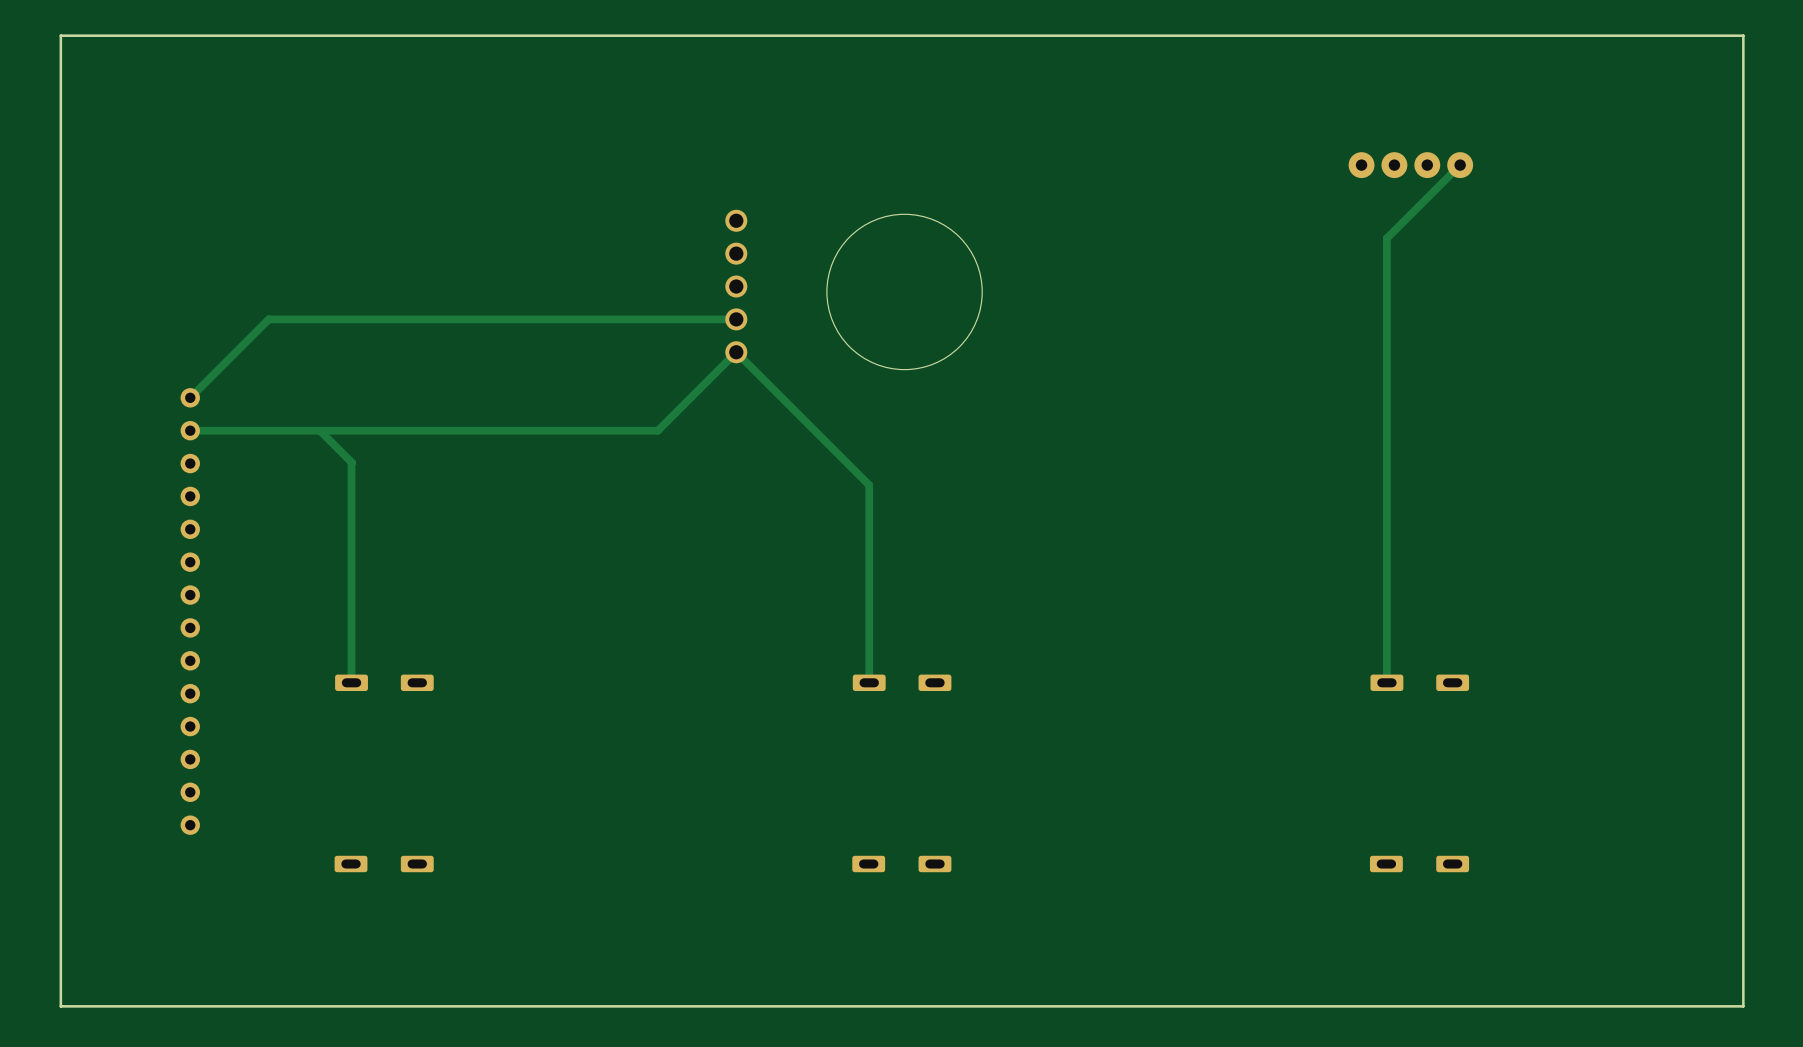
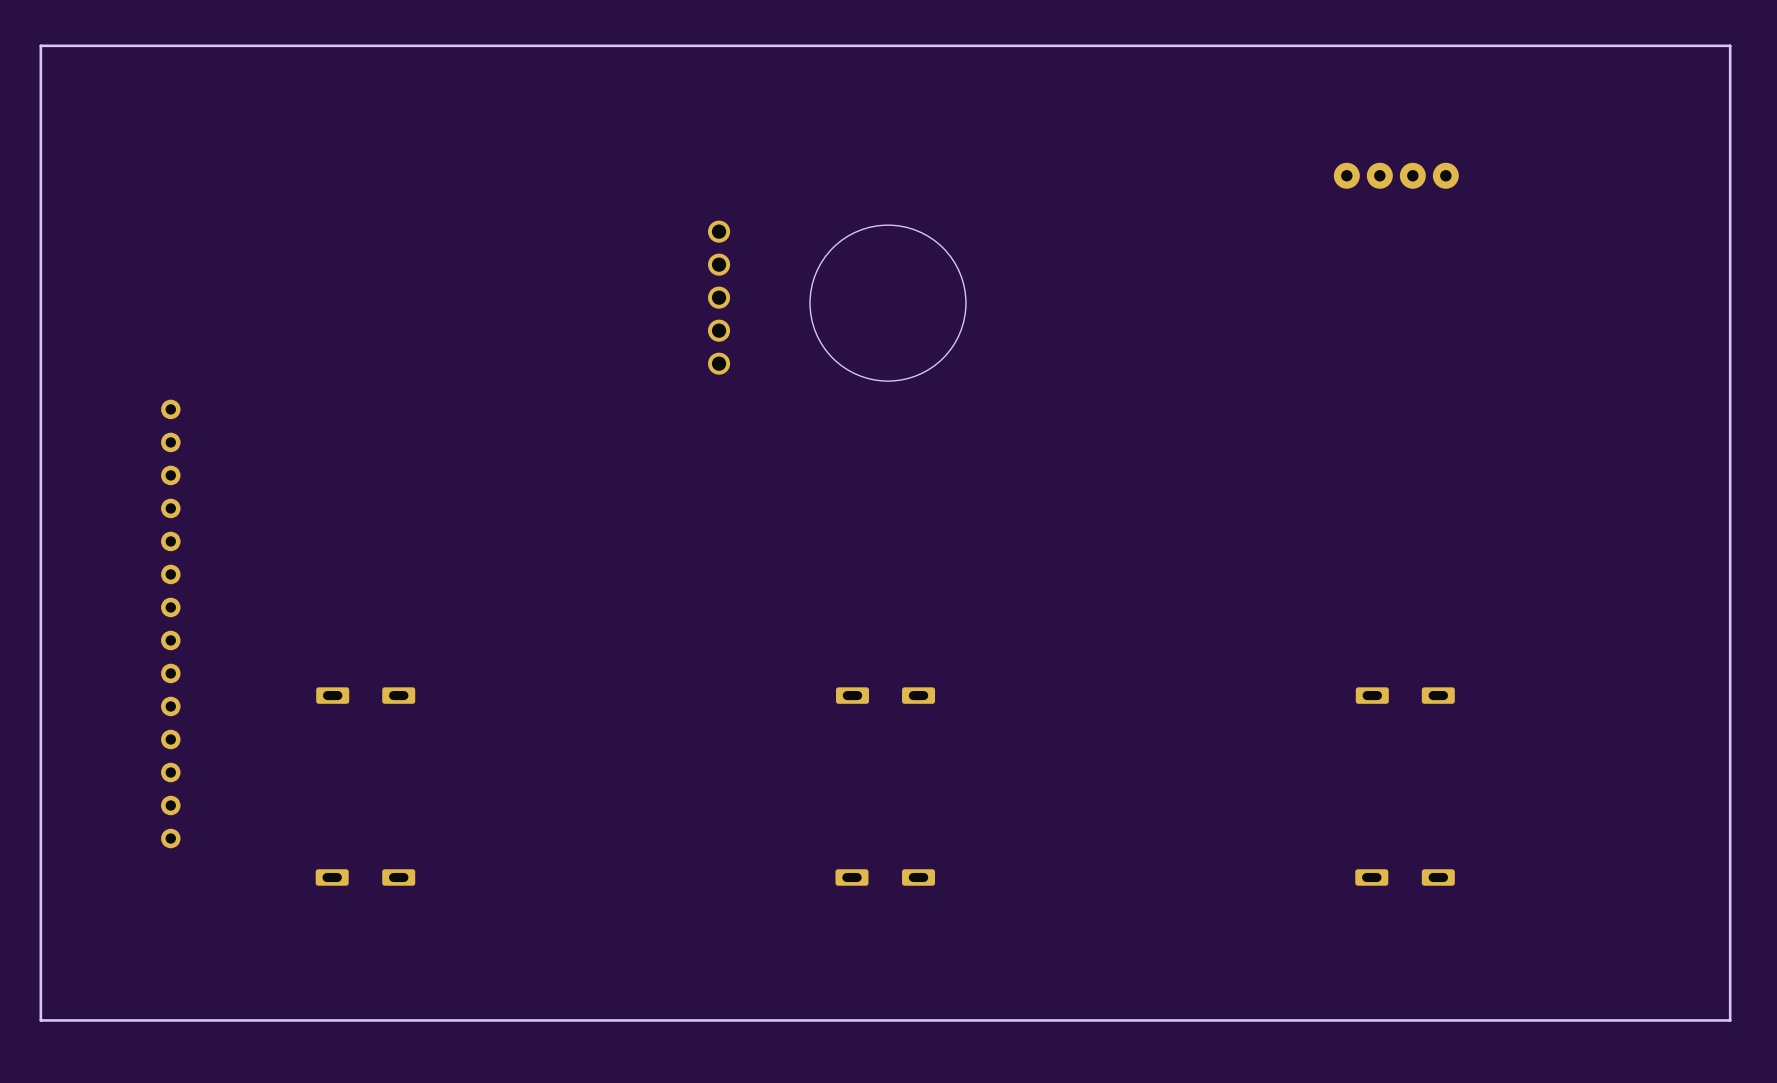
track: (1460, 165) (1386, 238) (1386, 682) -> none
track: (736, 319) (268, 319) (190, 397) -> none
track: (190, 430) (657, 430) (736, 352) (869, 485) (869, 682) -> none
track: (319, 430) (352, 462) (351, 682) -> none

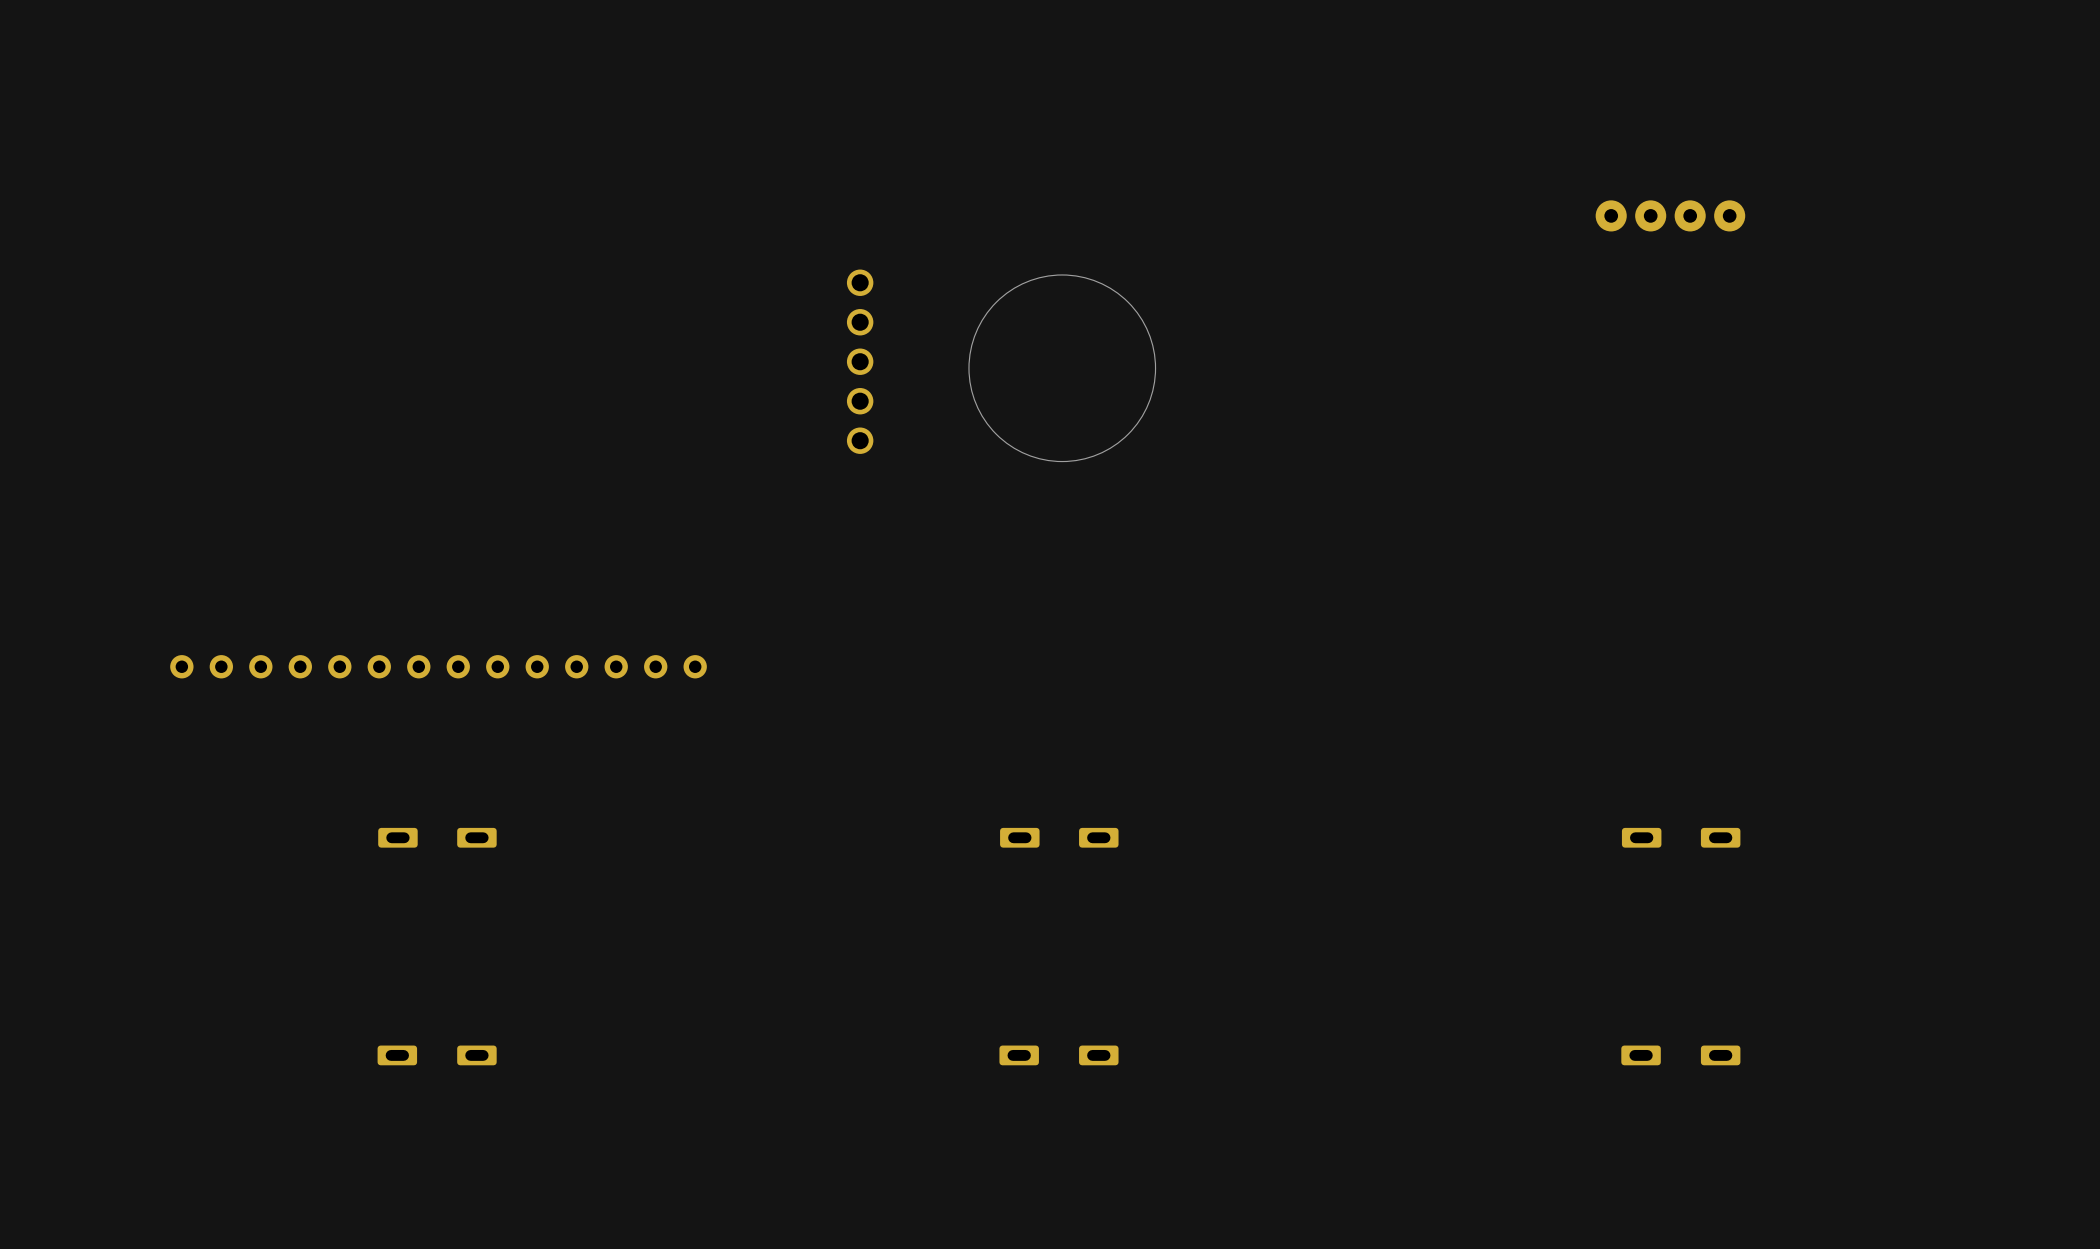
board edge: (1730, 45) (40, 45) (40, 1020) (1730, 1020) (1730, 45) -> none
part rotation: 0° (170, 623) -> 90° clockwise (438, 666)

